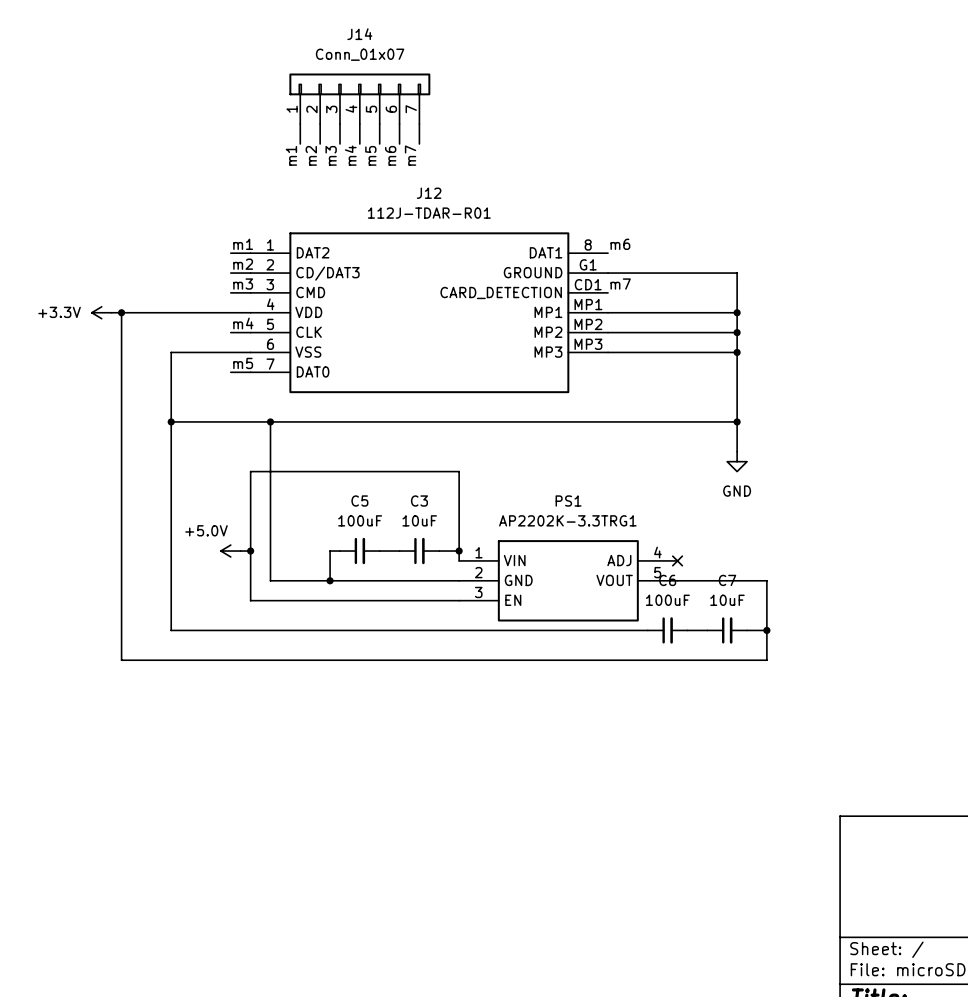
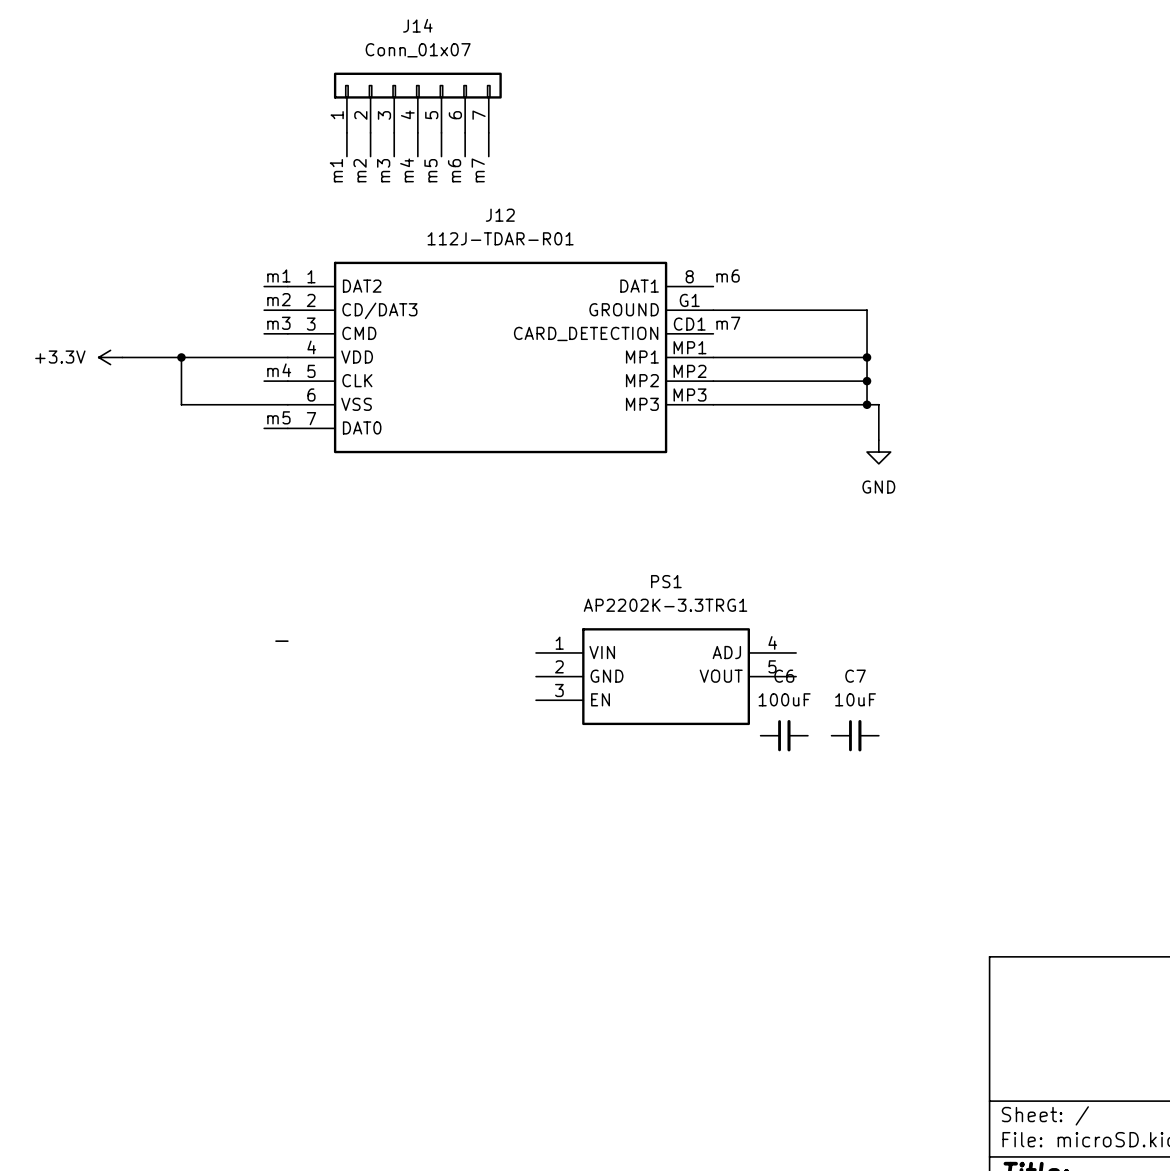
wire: (121, 312) (121, 660) (766, 660) (766, 580) (677, 580) -> none
junction position: (121, 312) -> (181, 357)
wire: (171, 352) (171, 630) (647, 630) -> (193, 404) (181, 404) (181, 357)
wire: (737, 352) (737, 451) -> (867, 404) (878, 404) (878, 440)
wire: (171, 421) (737, 421) -> none
junction: (171, 421) -> none
wire: (270, 421) (270, 580) (459, 580) -> none
junction: (270, 421) -> none
junction: (737, 421) -> none
power symbol position: GND (737, 461) -> GND (878, 452)
power symbol: +5.0V (230, 551) -> none
junction: (250, 551) -> none
wire: (339, 551) (330, 551) (330, 580) -> none
C5: 100uF (359, 551) -> none
wire: (379, 551) (399, 551) -> none
C3: 10uF (419, 551) -> none
wire: (439, 551) (459, 551) -> none
junction: (459, 551) -> none
wire: (459, 560) (459, 471) (250, 471) (250, 600) (459, 600) -> none
no-connect mark: (677, 560) -> none
junction: (330, 580) -> none
wire: (687, 630) (707, 630) -> none
wire: (747, 630) (766, 630) -> none
junction: (766, 630) -> none

